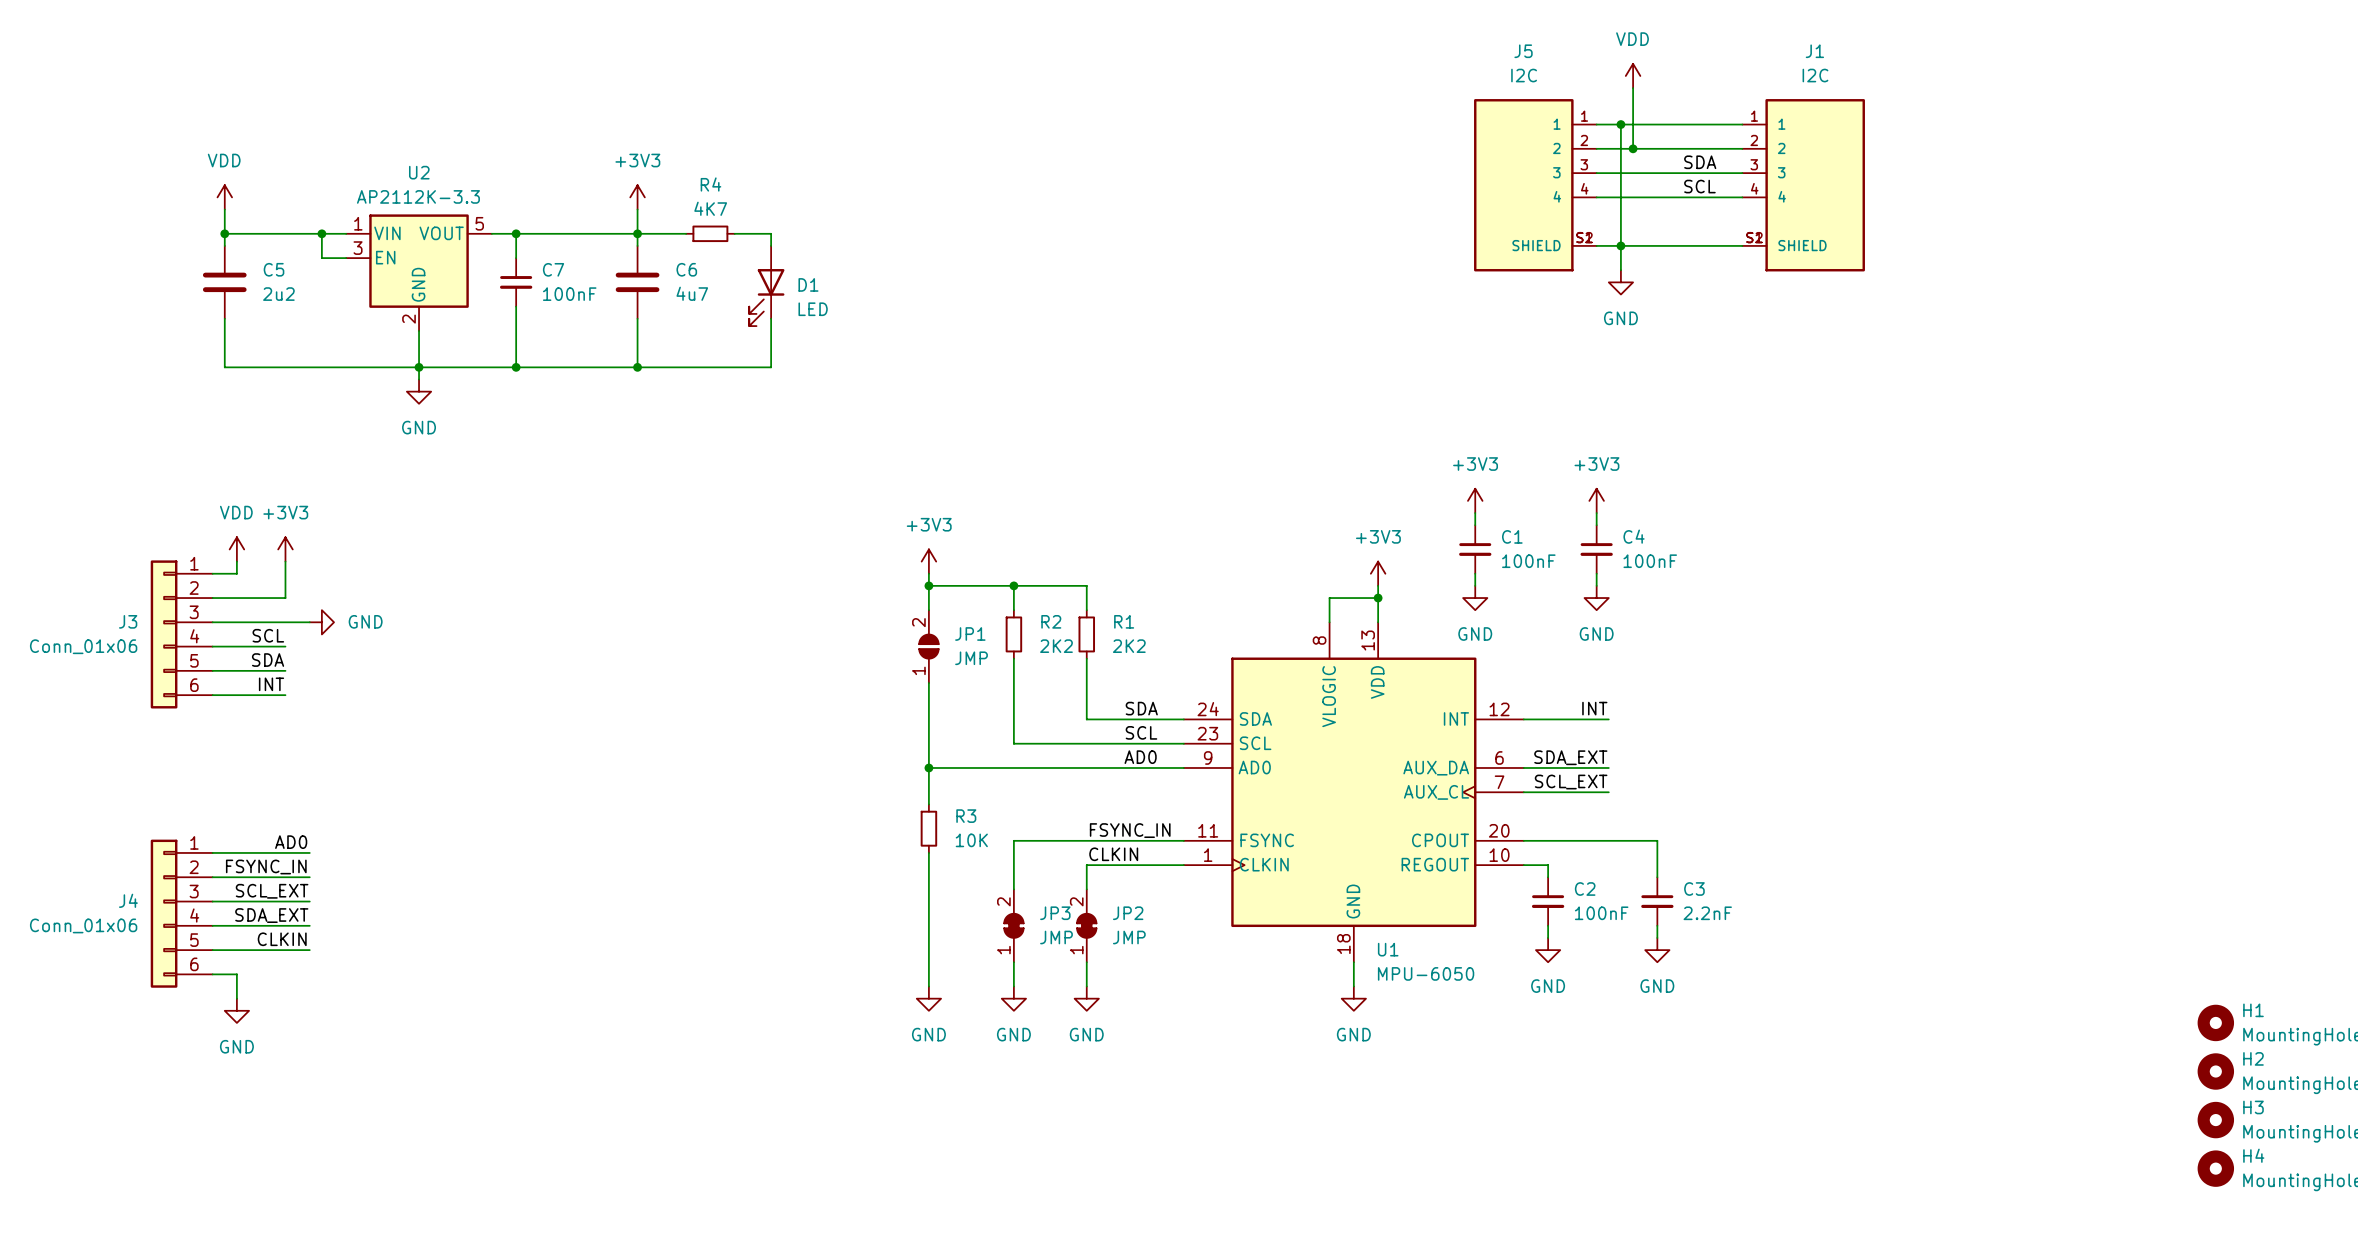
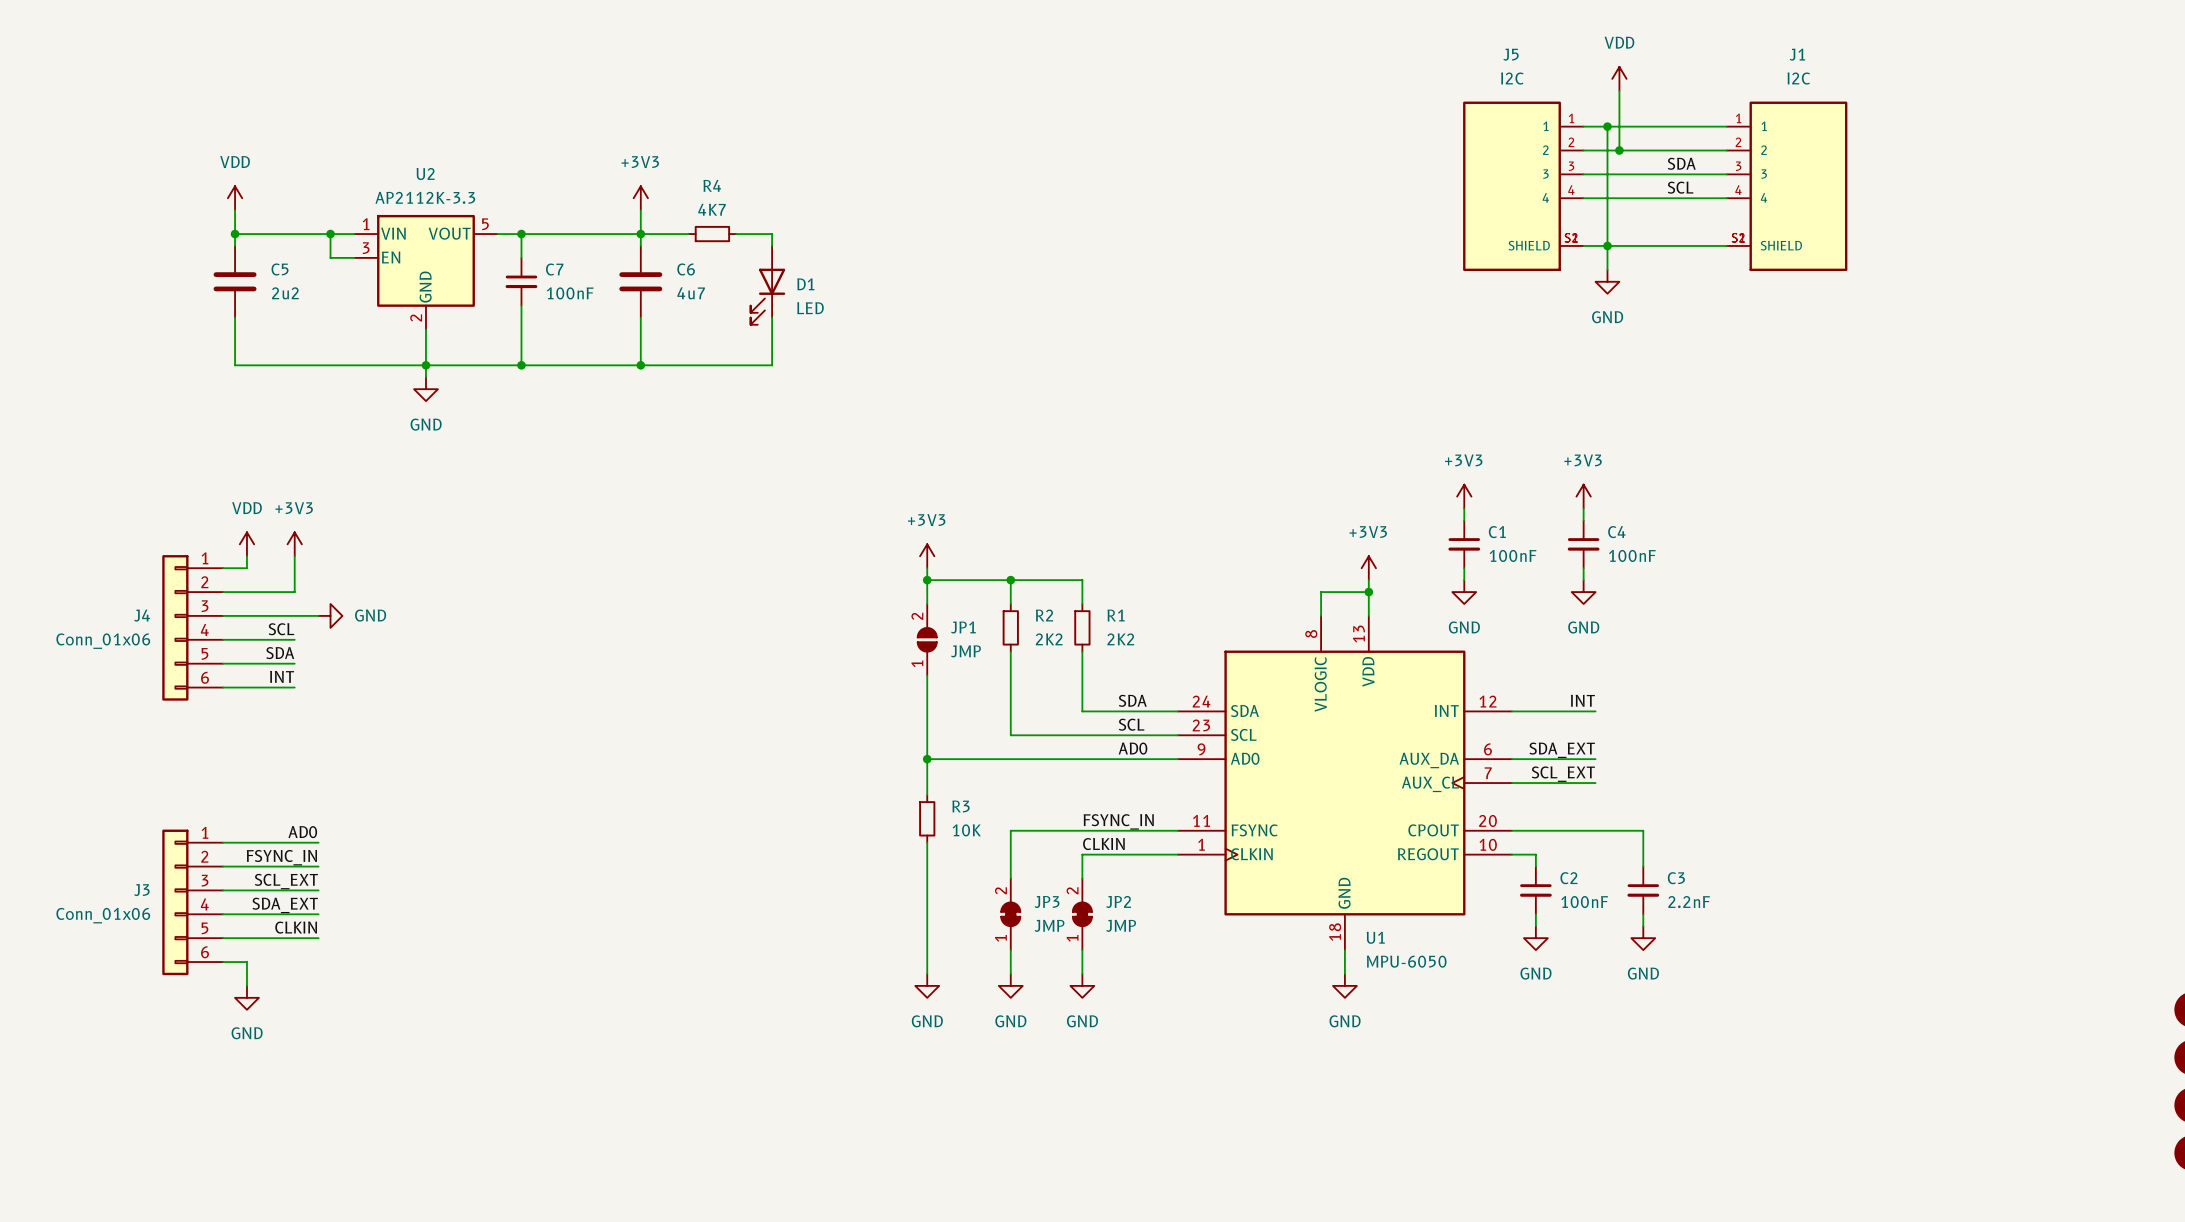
J3 name: J3 (128, 621) -> J4 (142, 615)
J4 name: J4 (128, 900) -> J3 (141, 890)

